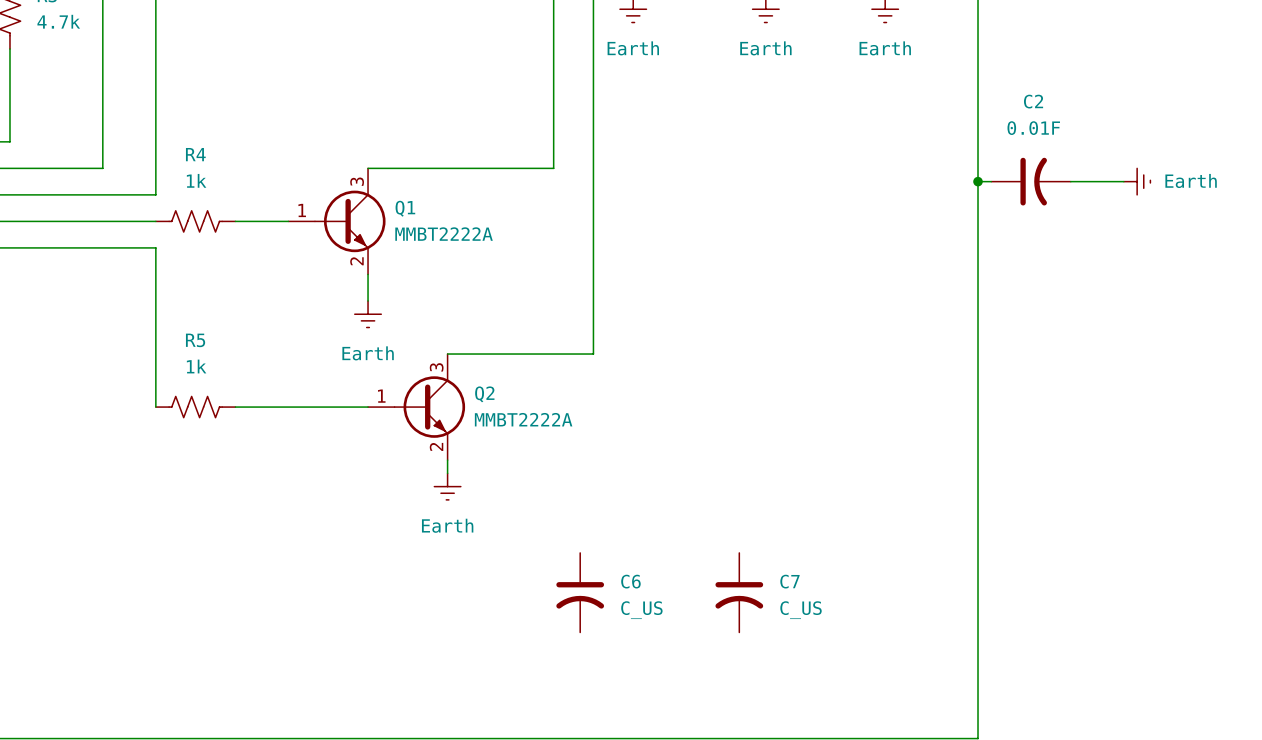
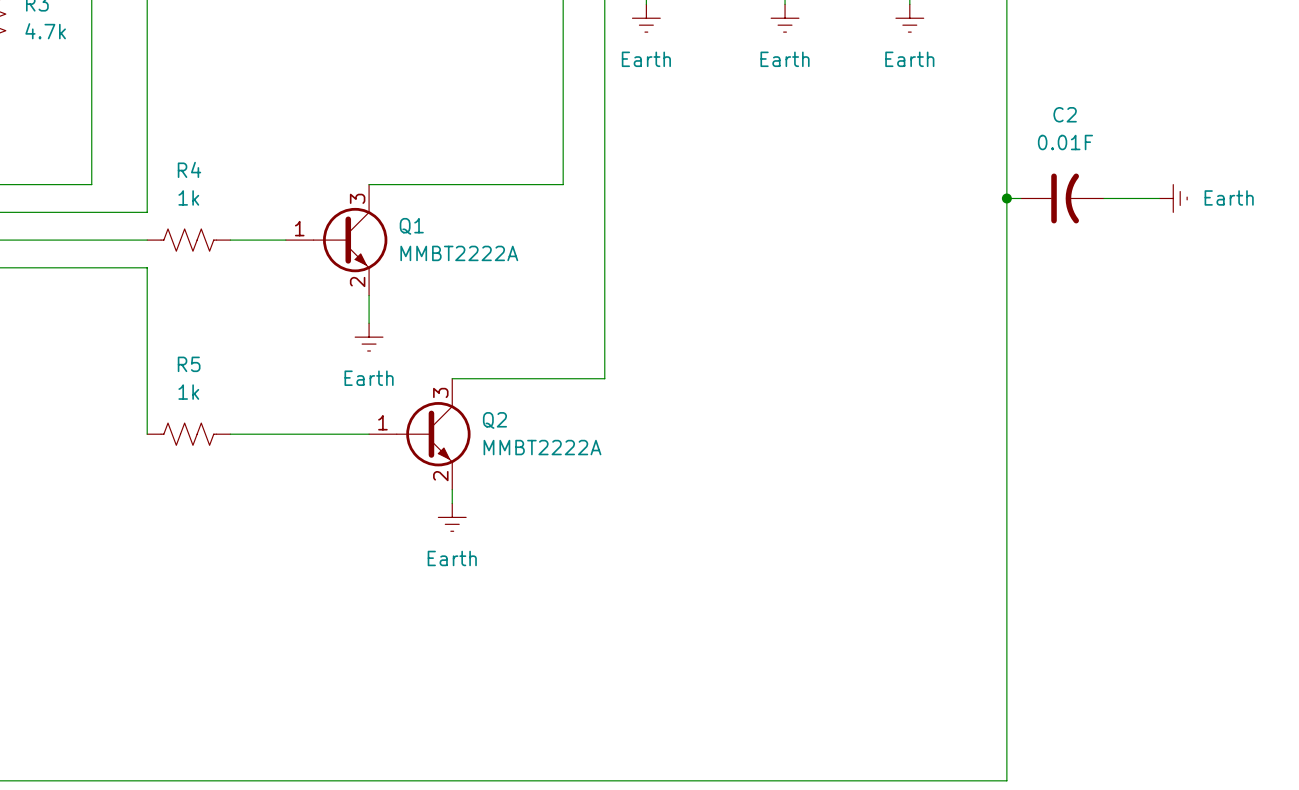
C6: C_US (580, 592) -> none
C7: C_US (739, 592) -> none

